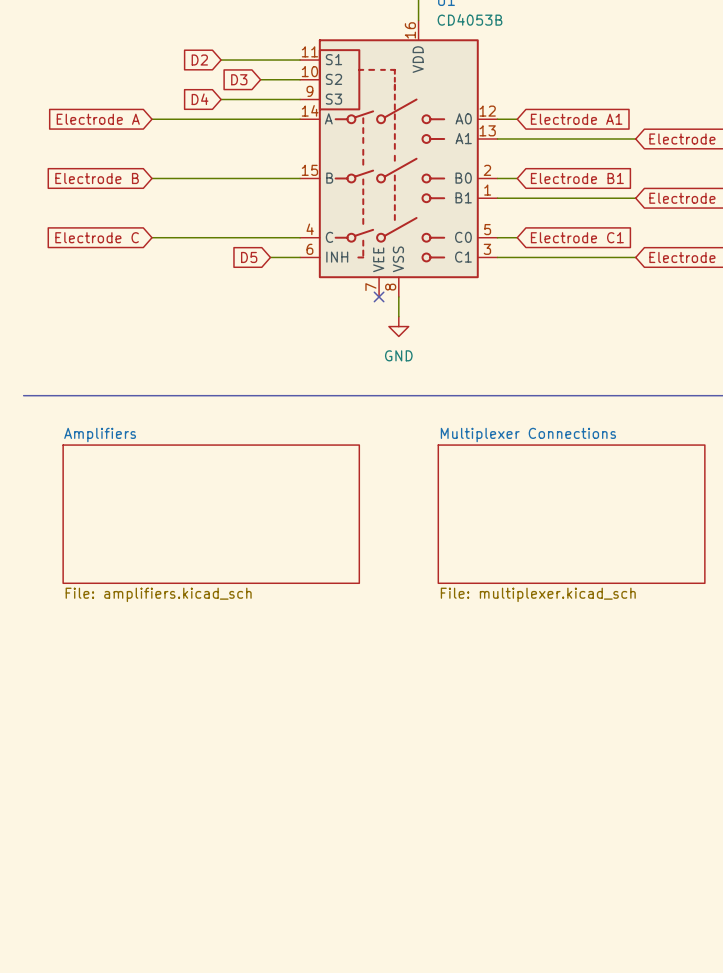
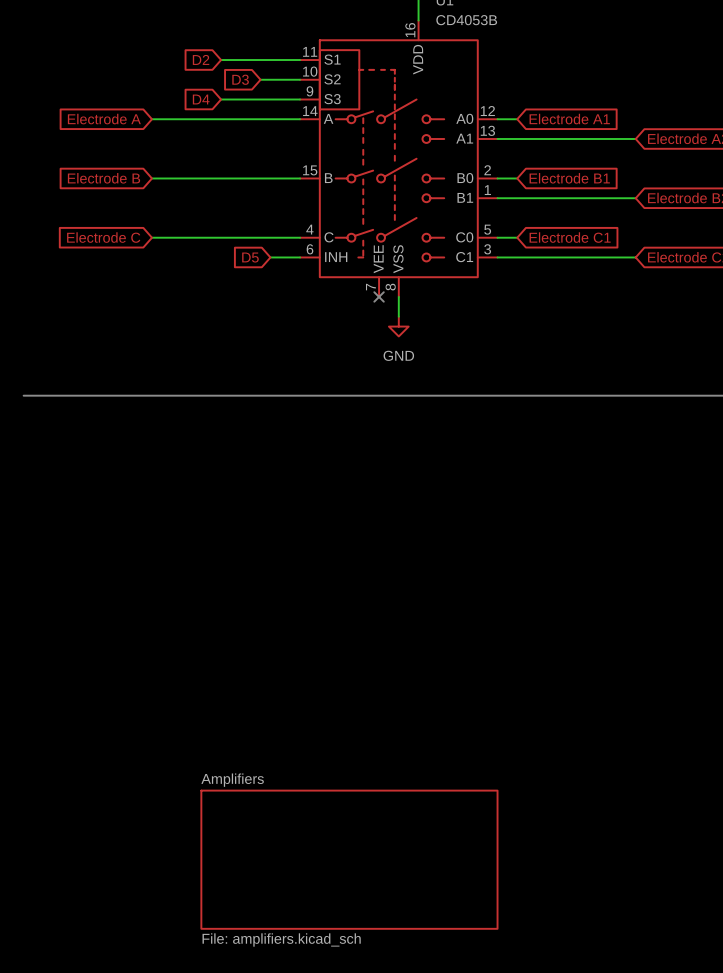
sheet Amplifiers: File: amplifiers.kicad_sch (211, 514) -> none
sheet Multiplexer Connections: File: multiplexer.kicad_sch (571, 514) -> none
sheet Amplifiers: none -> File: amplifiers.kicad_sch (349, 859)

